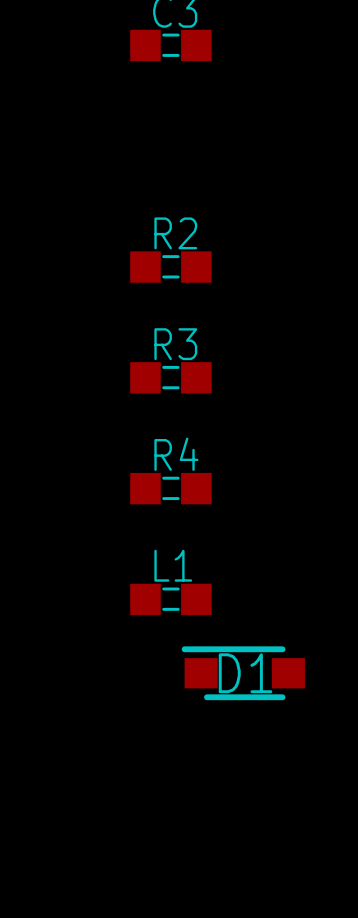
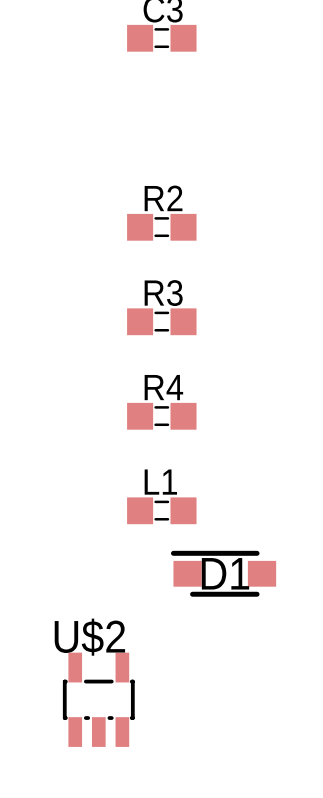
U$2: none -> (98, 699)

